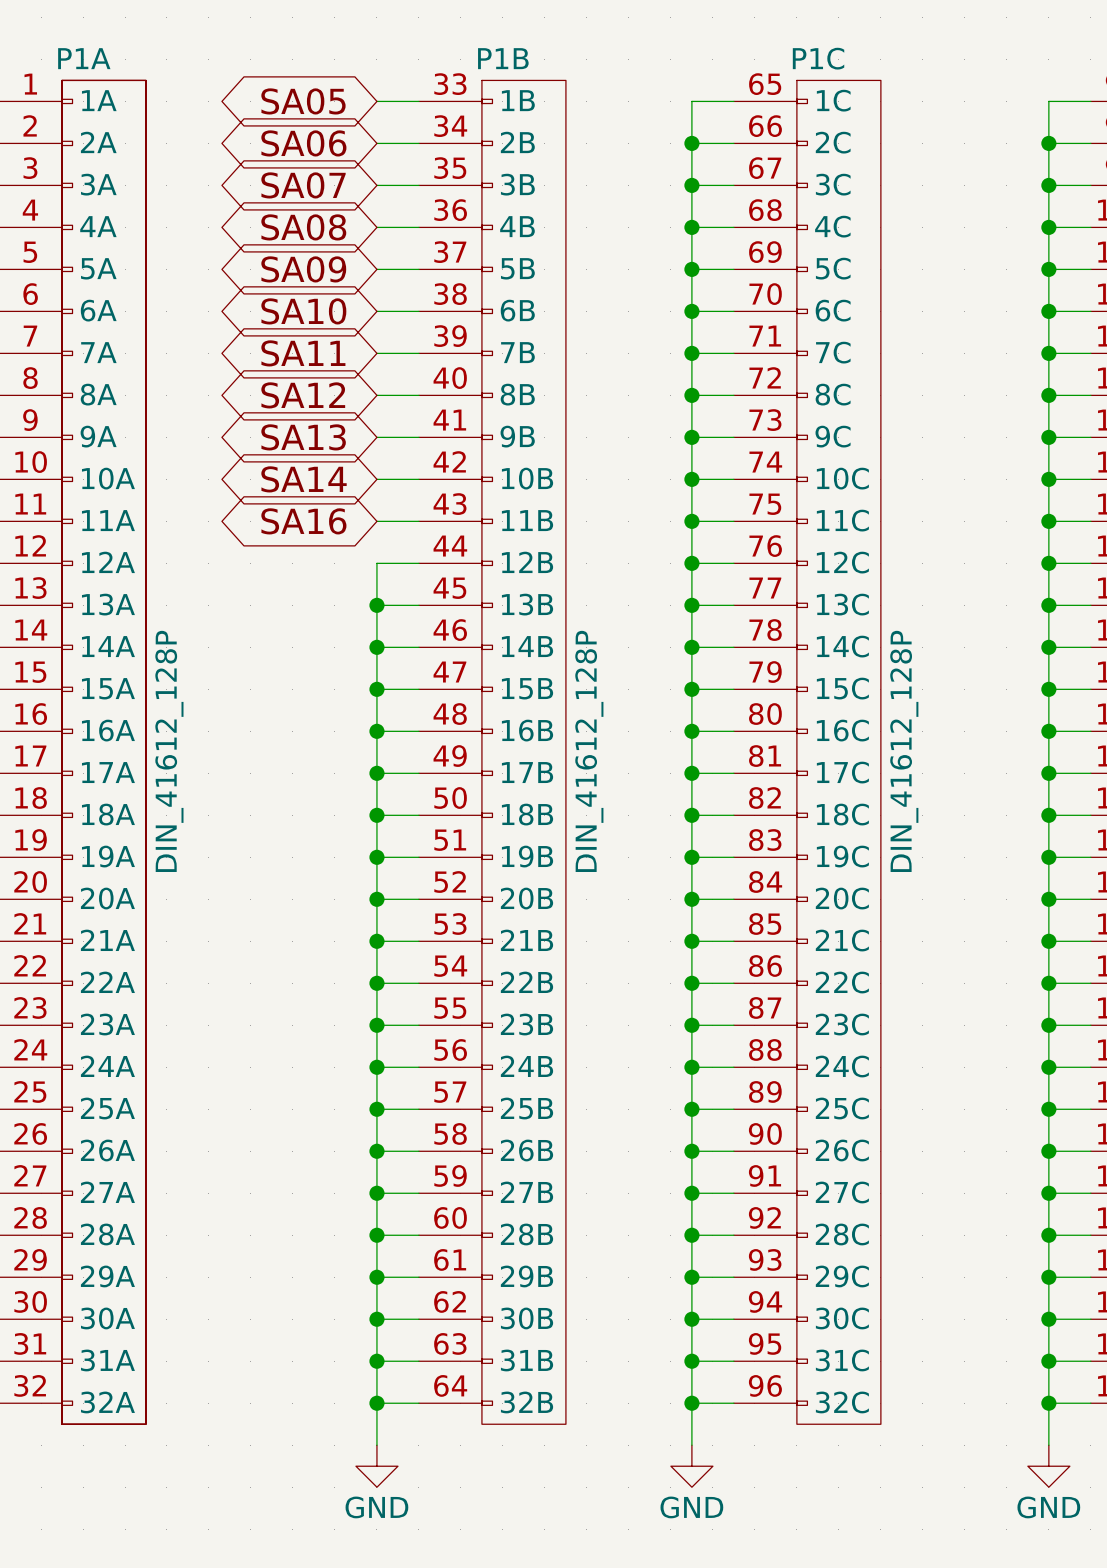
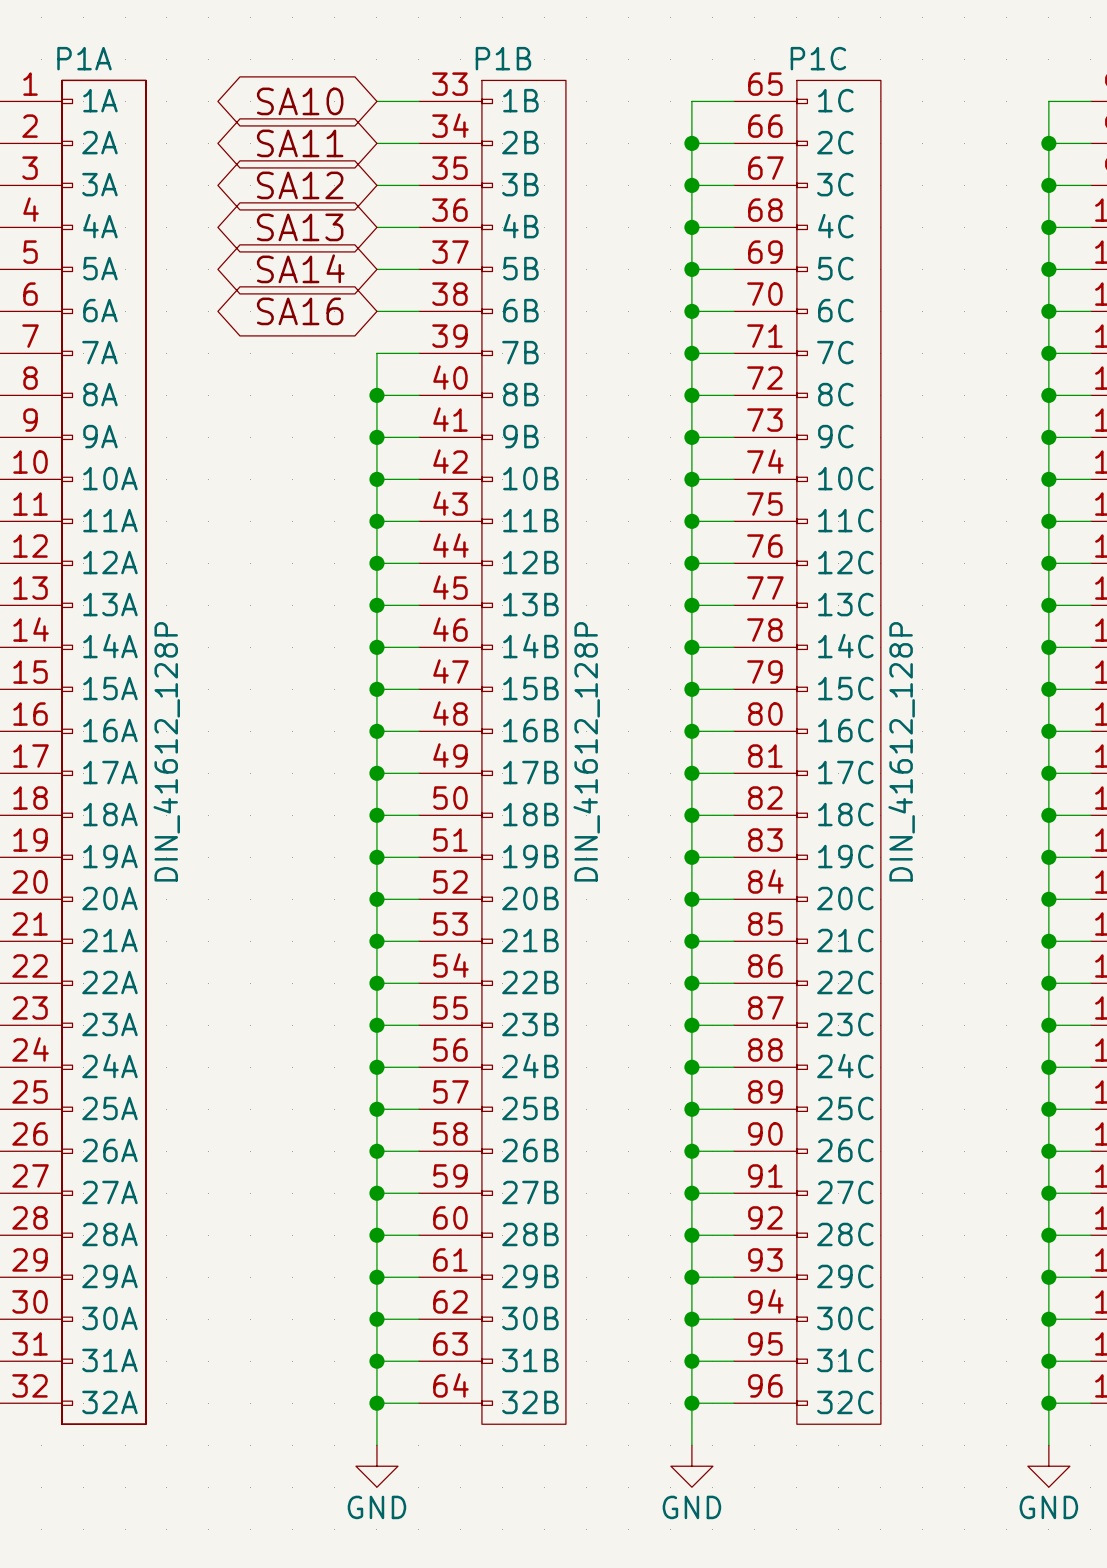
global label: SA05 (303, 101) -> SA10 (300, 101)
global label: SA06 (303, 143) -> SA11 (300, 143)
global label: SA07 (303, 185) -> SA12 (300, 185)
global label: SA08 (303, 227) -> SA13 (300, 227)
global label: SA09 (303, 269) -> SA14 (300, 268)
global label: SA10 (303, 311) -> SA16 (300, 311)
global label: SA11 (303, 353) -> none
wire: none -> (376, 353) (376, 563)
global label: SA12 (303, 395) -> none
junction: none -> (376, 395)
global label: SA13 (303, 437) -> none
junction: none -> (376, 437)
global label: SA14 (304, 479) -> none
junction: none -> (376, 479)
global label: SA16 (303, 521) -> none
junction: none -> (376, 521)
junction: none -> (376, 563)

